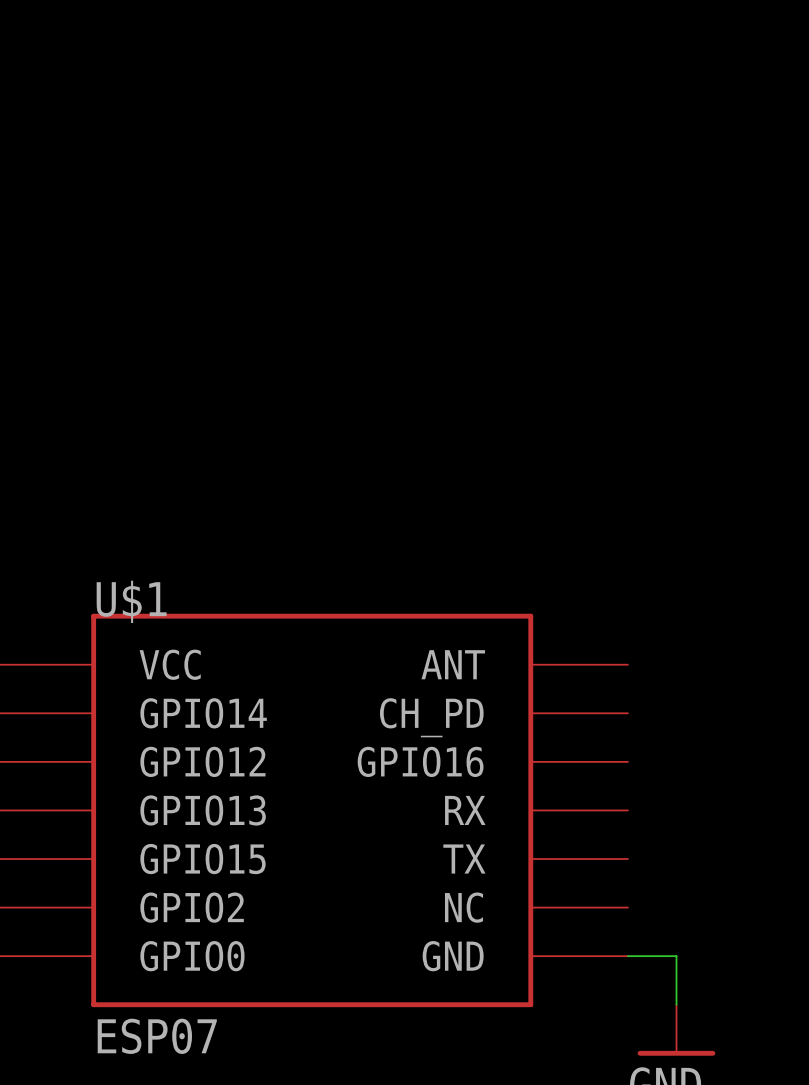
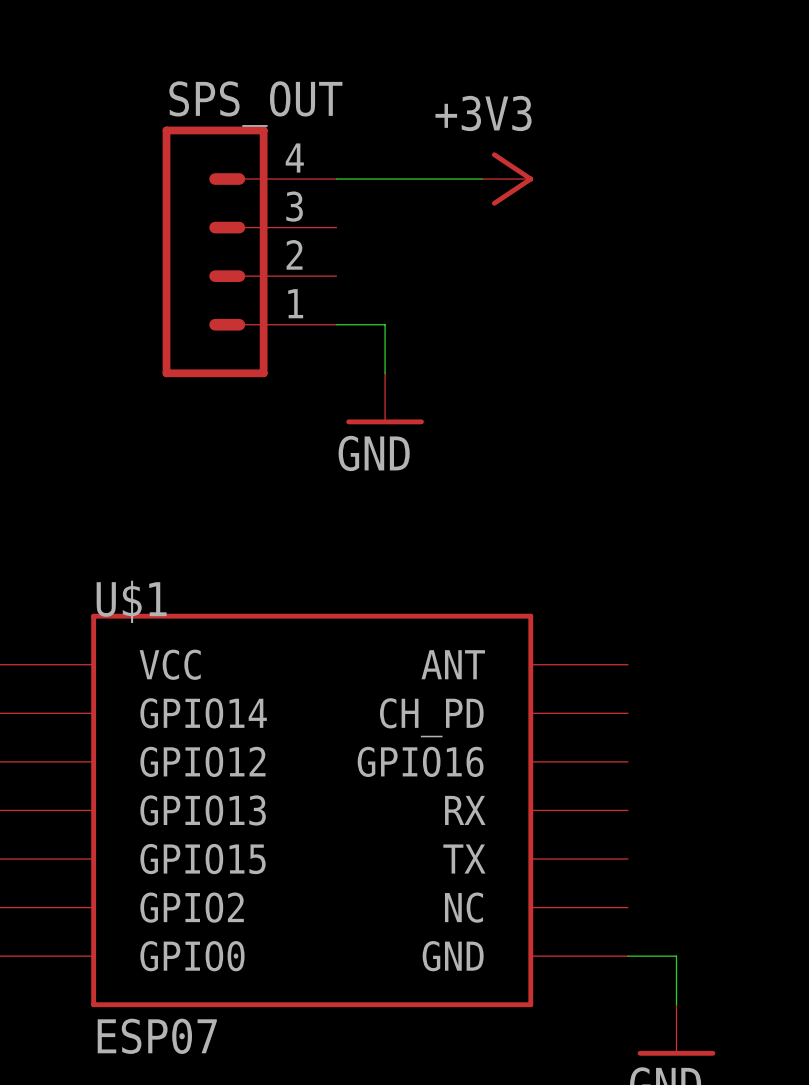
wire: none -> (336, 179) (482, 179)
power symbol: none -> +3V3 (507, 179)
SPS_OUT: none -> (249, 251)
wire: none -> (336, 324) (385, 324) (385, 373)
power symbol: none -> GND (385, 398)

